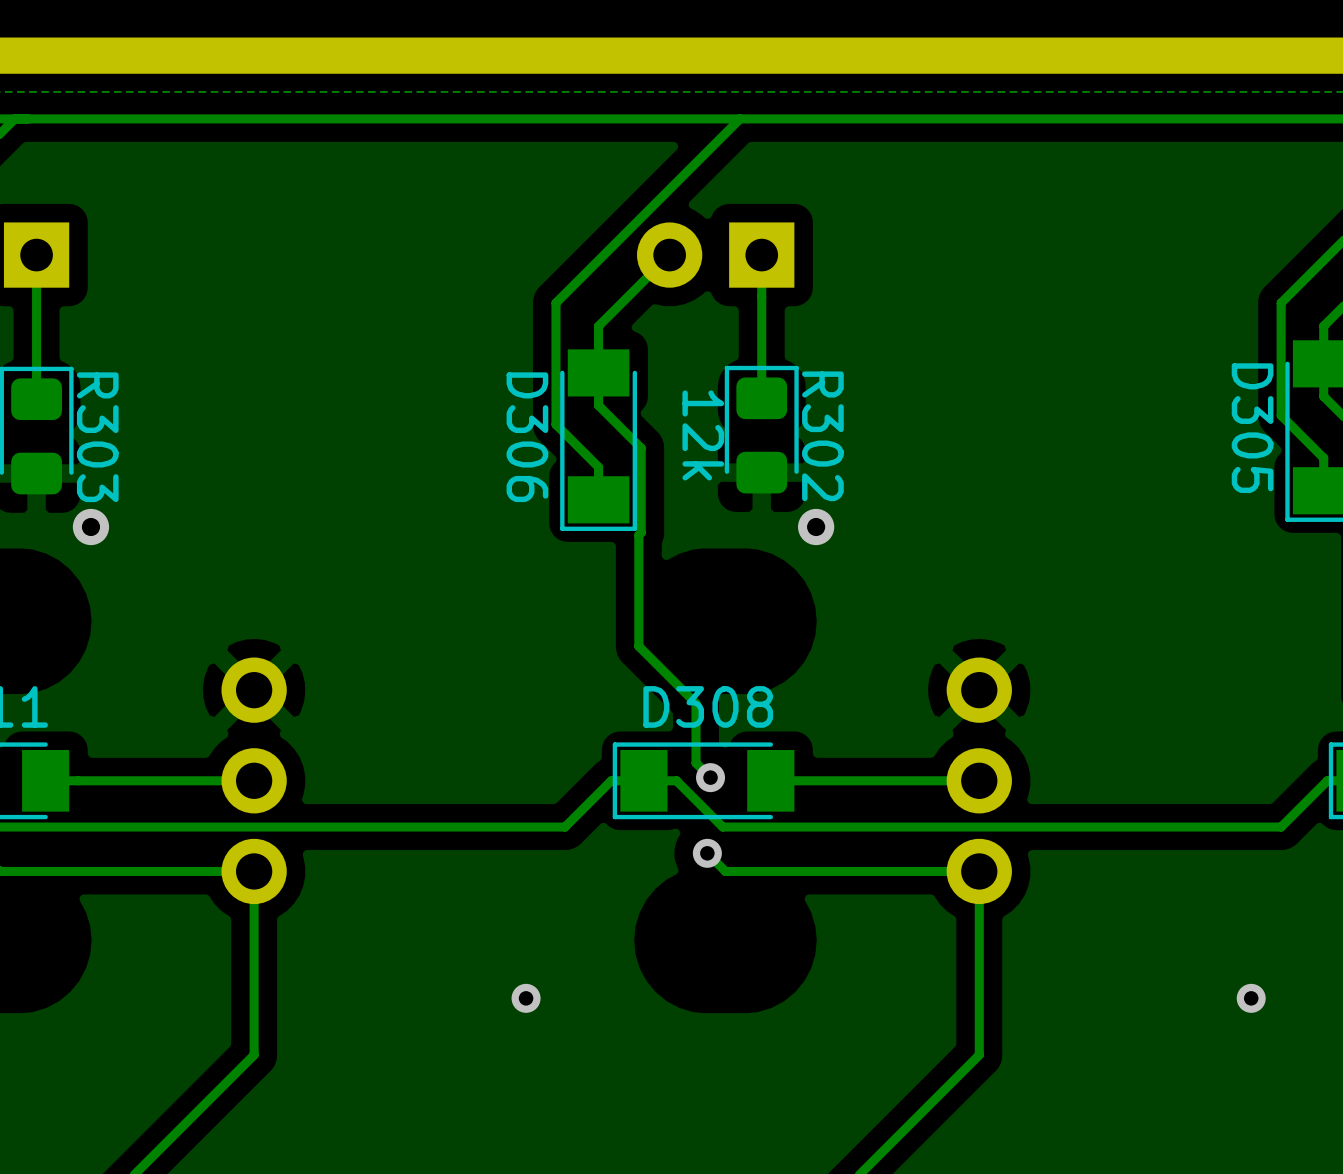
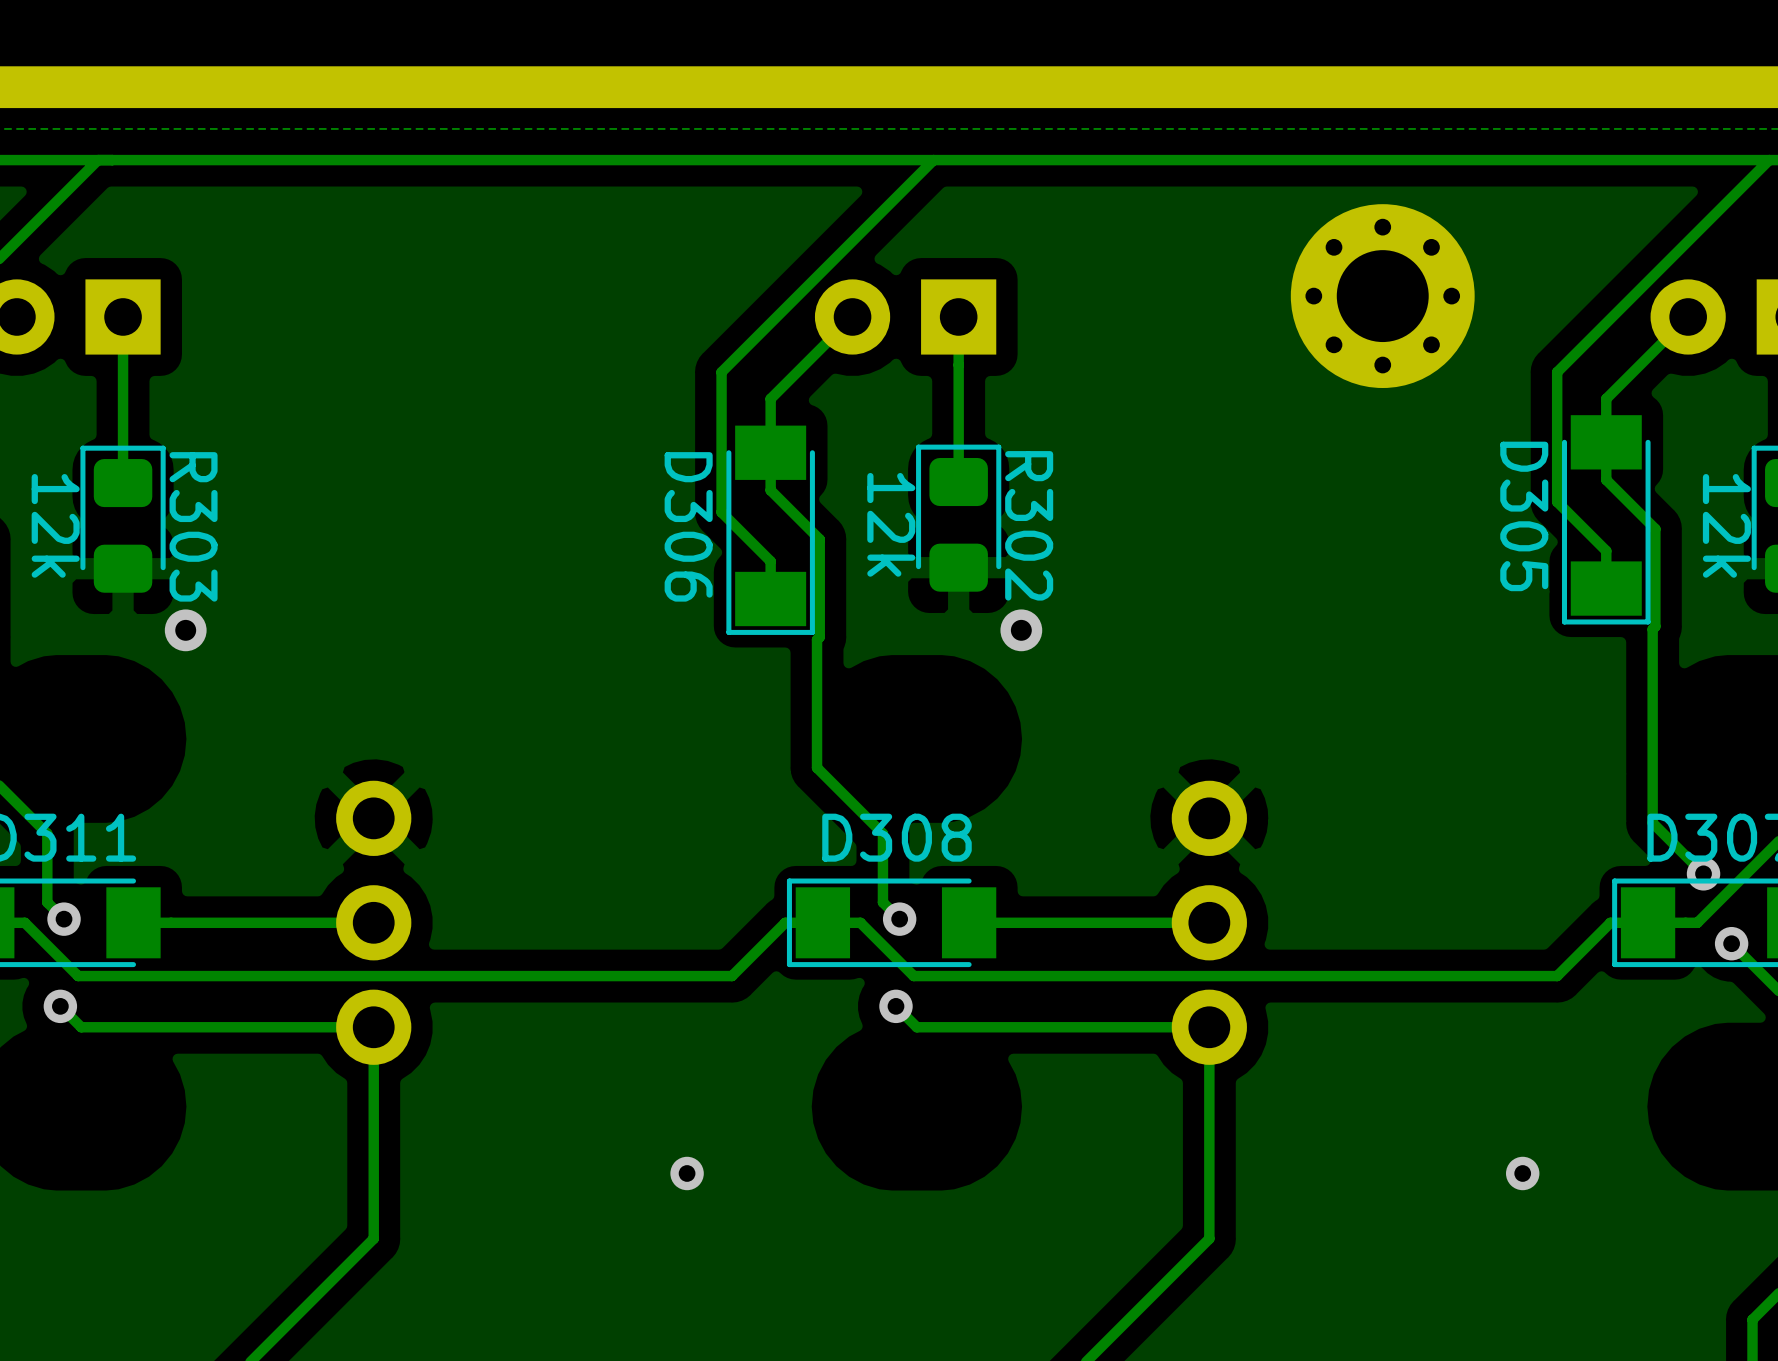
part: none -> (1382, 296)

